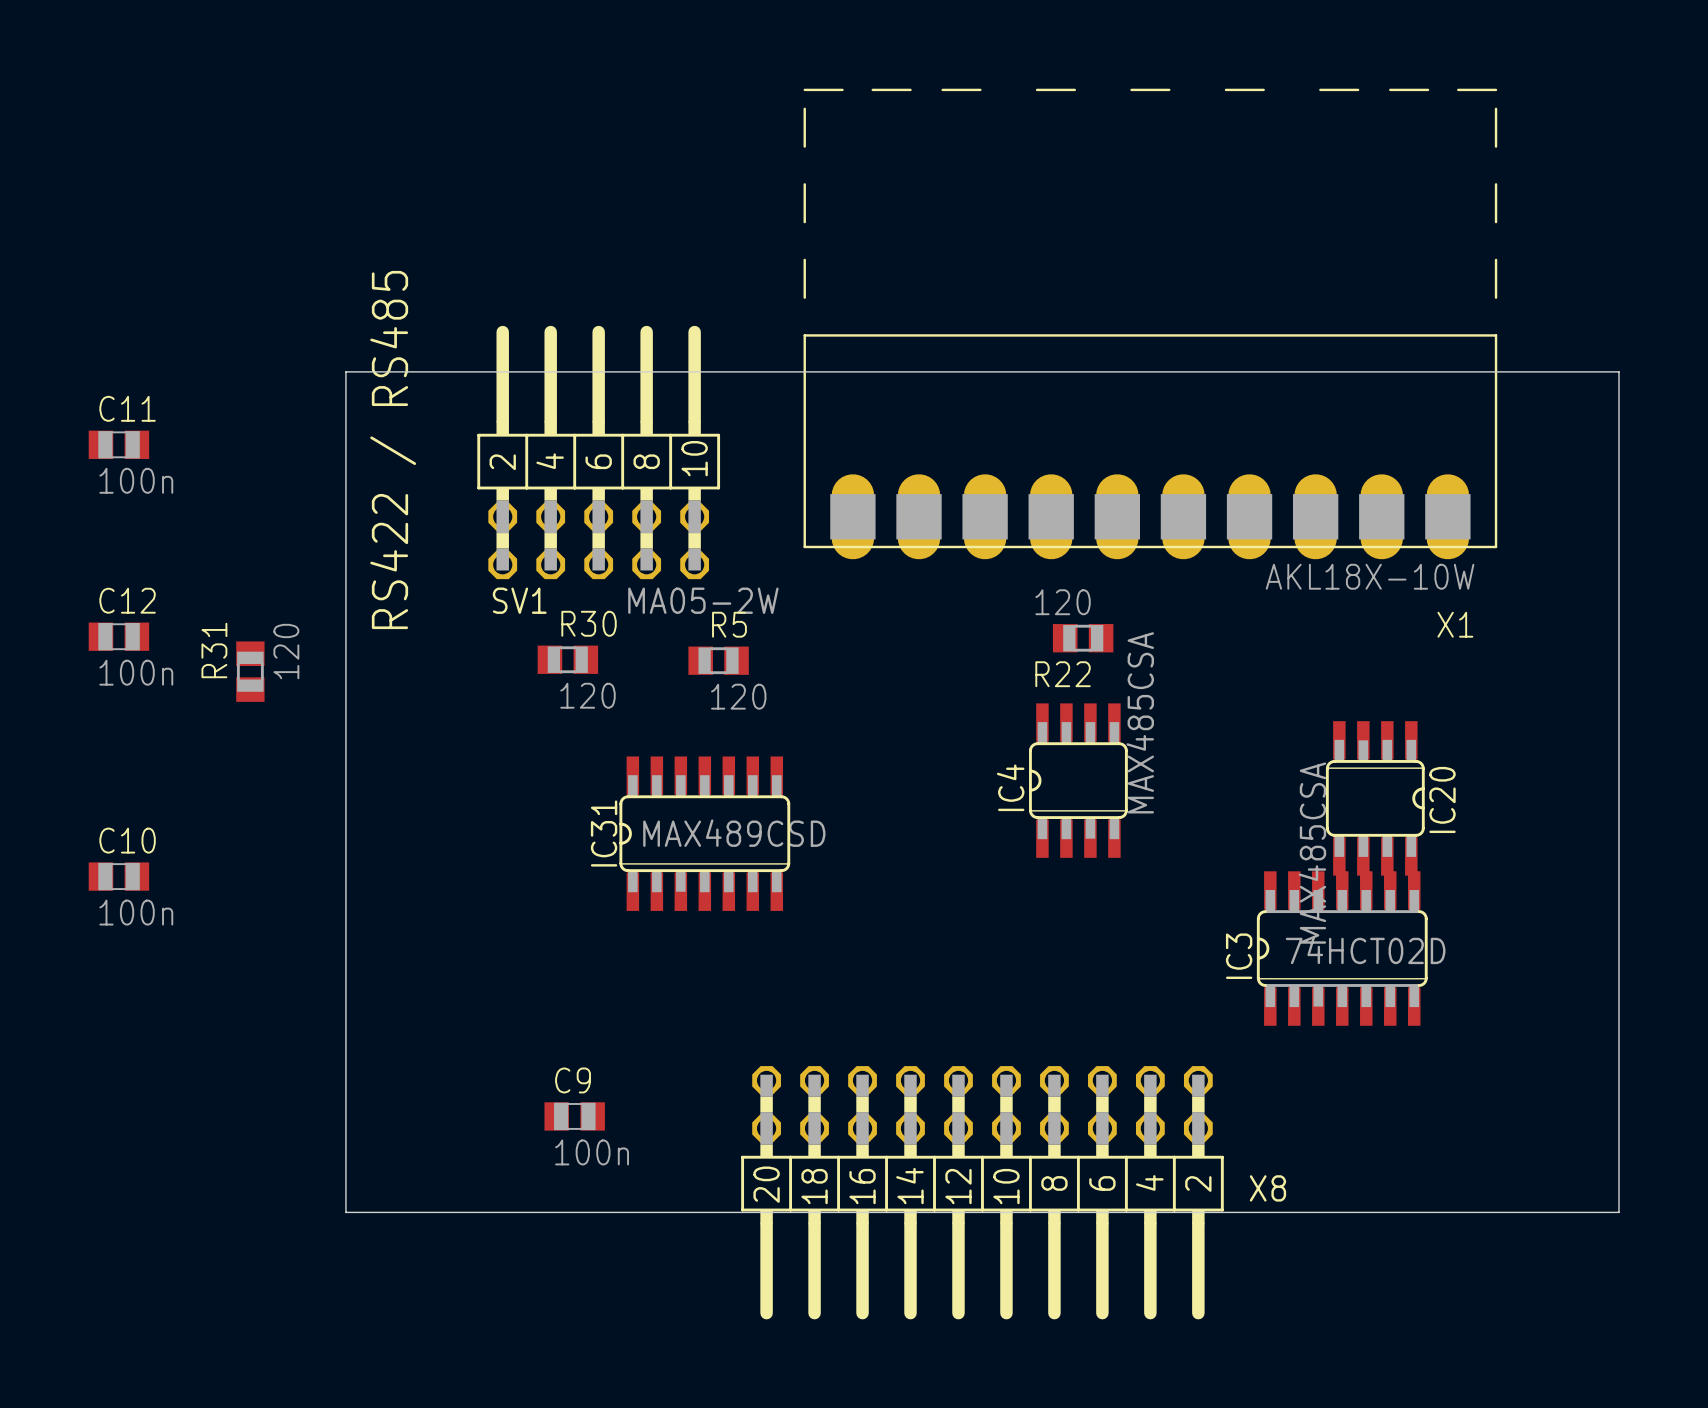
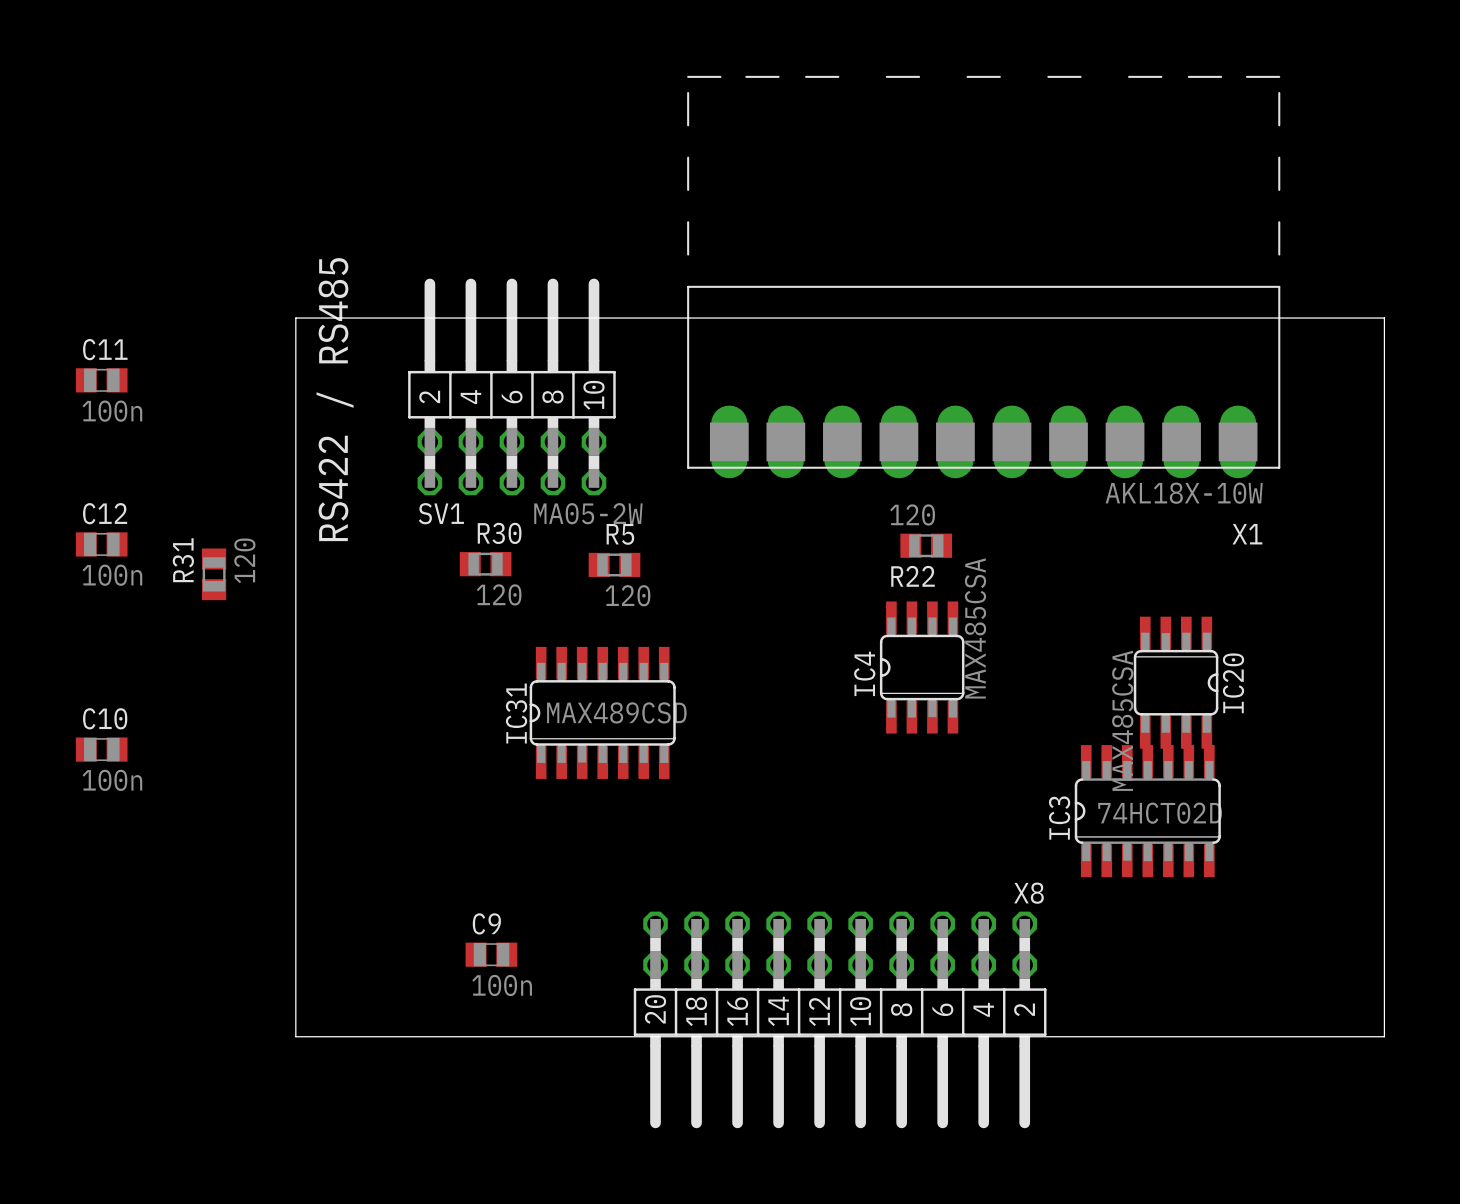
X8 name position: X8 (1267, 1188) -> X8 (1028, 893)

